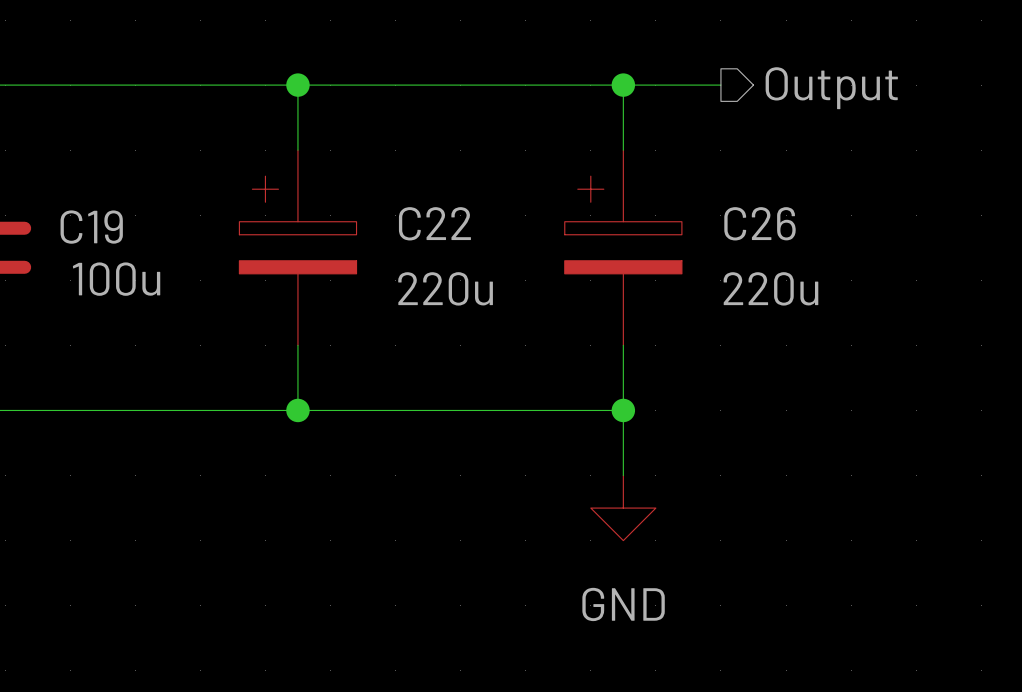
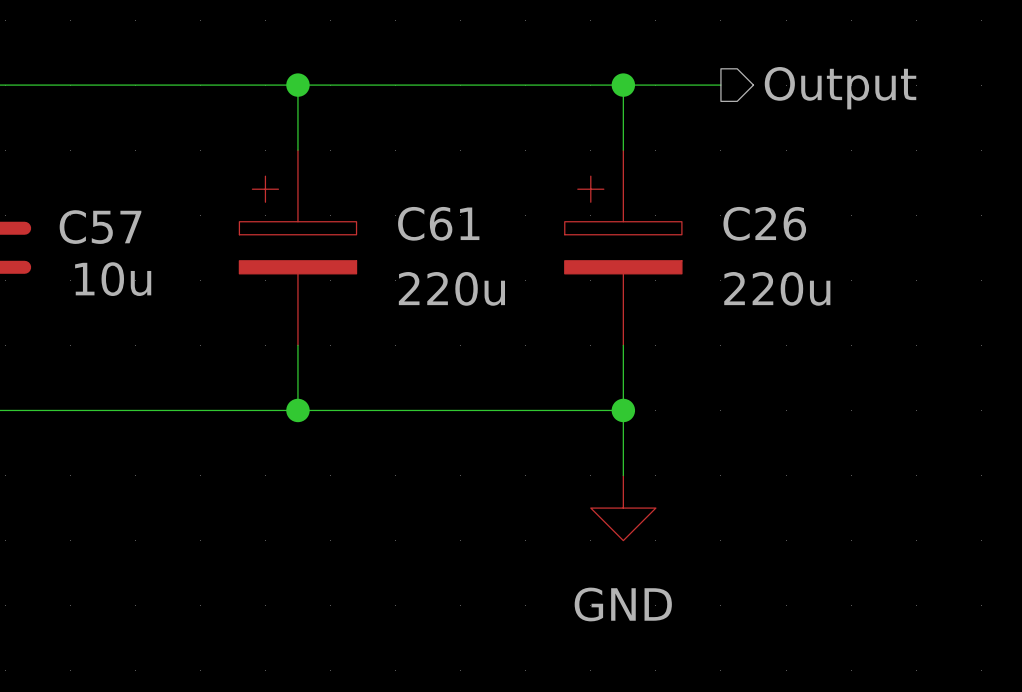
C22 name: C22 (434, 223) -> C61 (438, 223)
C19 name: C19 (91, 227) -> C57 (100, 227)
C19 value: 100u (116, 279) -> 10u (113, 279)

